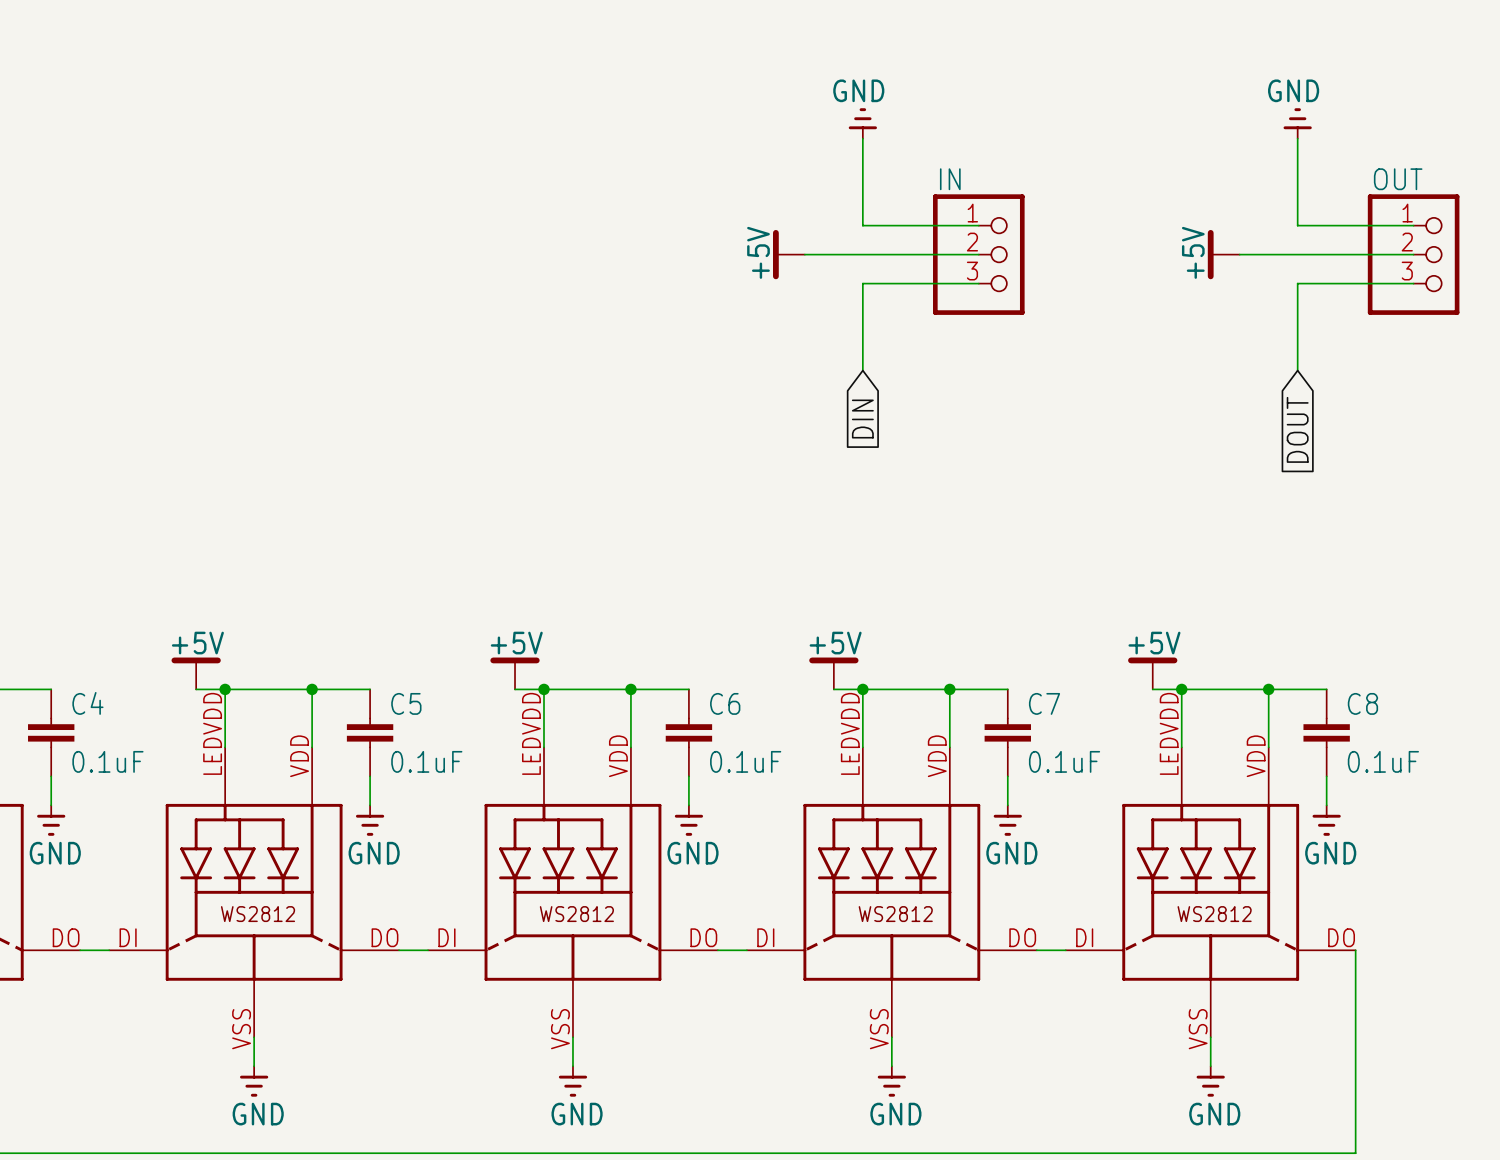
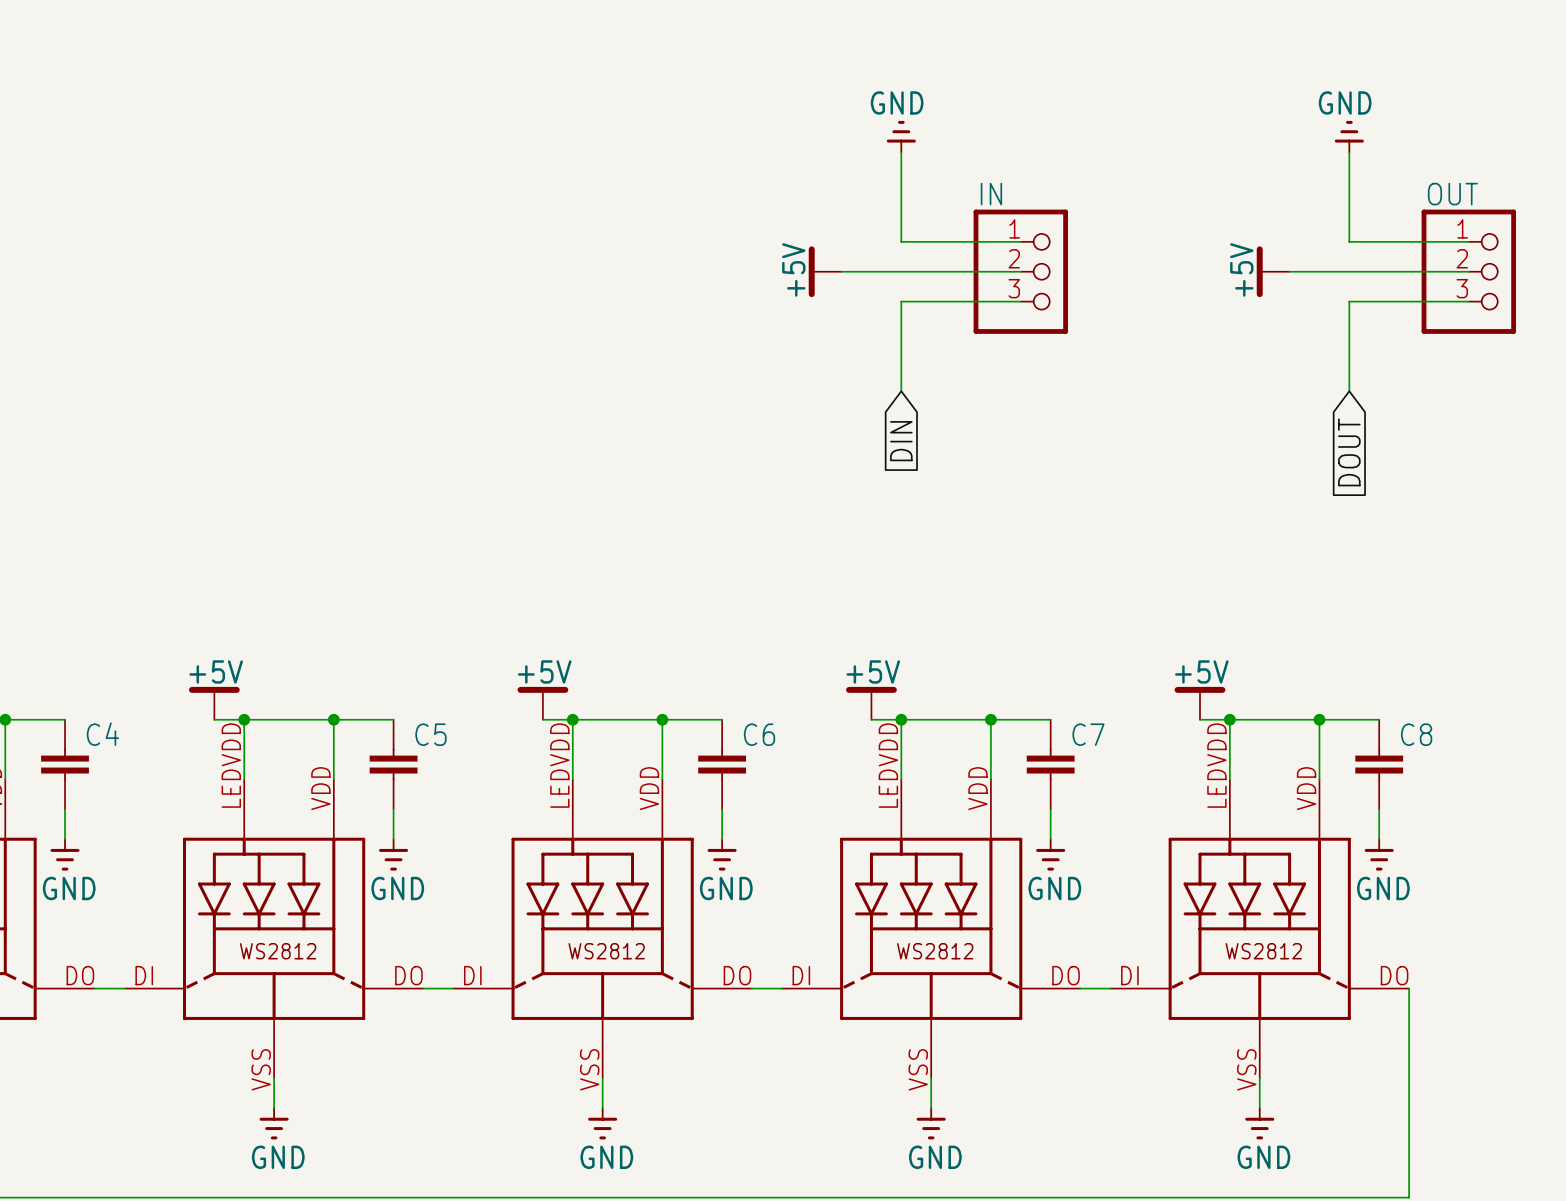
C4 value: 0.1uF (107, 761) -> none
C5 value: 0.1uF (426, 761) -> none
C6 value: 0.1uF (745, 761) -> none
C7 value: 0.1uF (1064, 761) -> none
C8 value: 0.1uF (1383, 761) -> none

